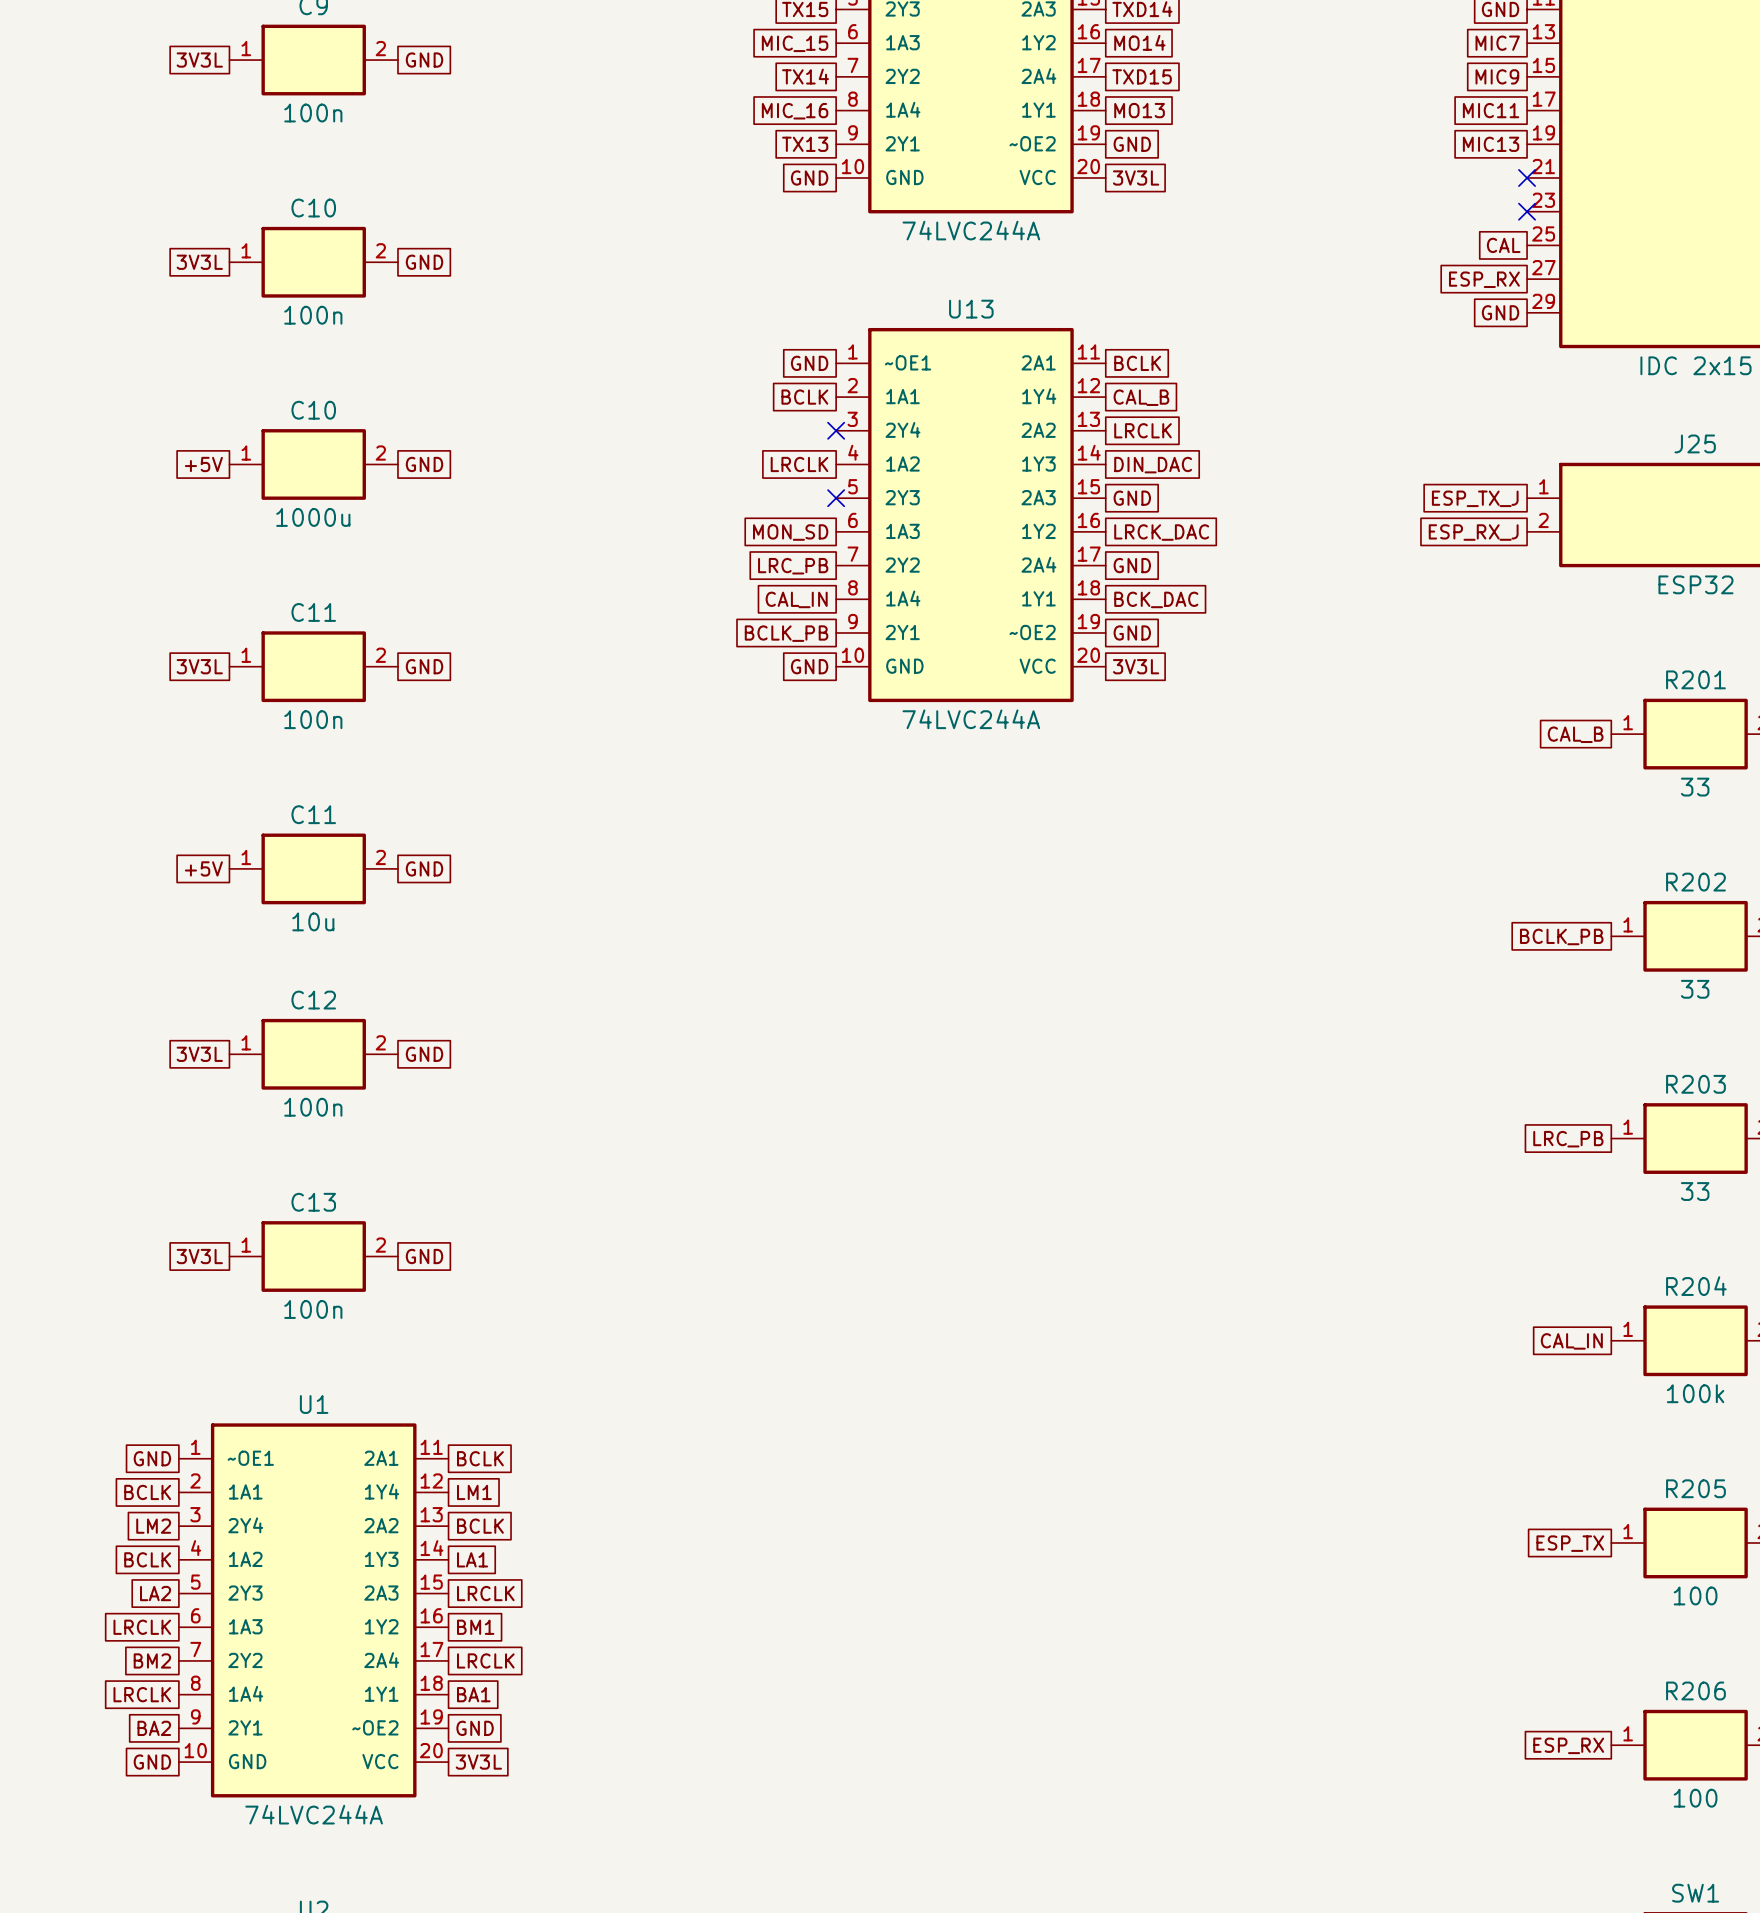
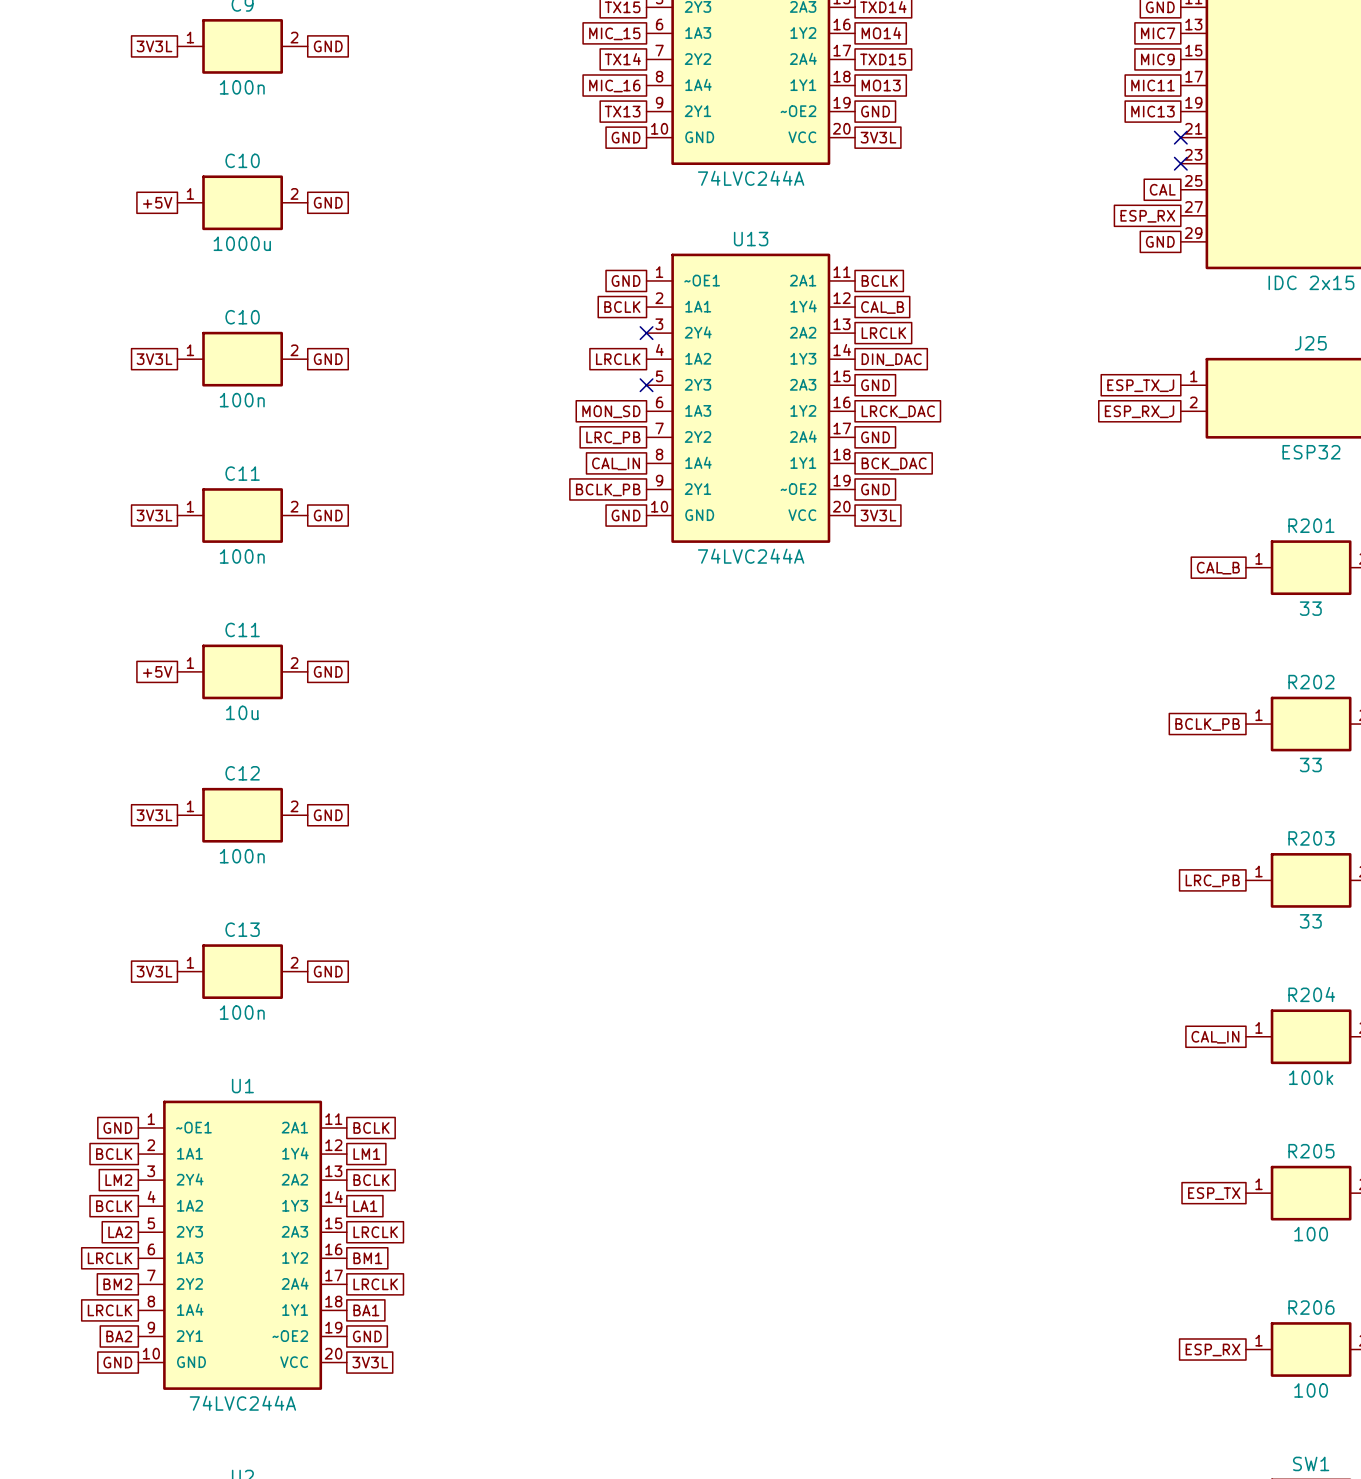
global label: 3V3L (199, 262) -> +5V (157, 202)
C10 value: 100n (313, 315) -> 1000u (242, 243)
global label: +5V (203, 464) -> 3V3L (154, 359)
C10 value: 1000u (313, 517) -> 100n (242, 400)

